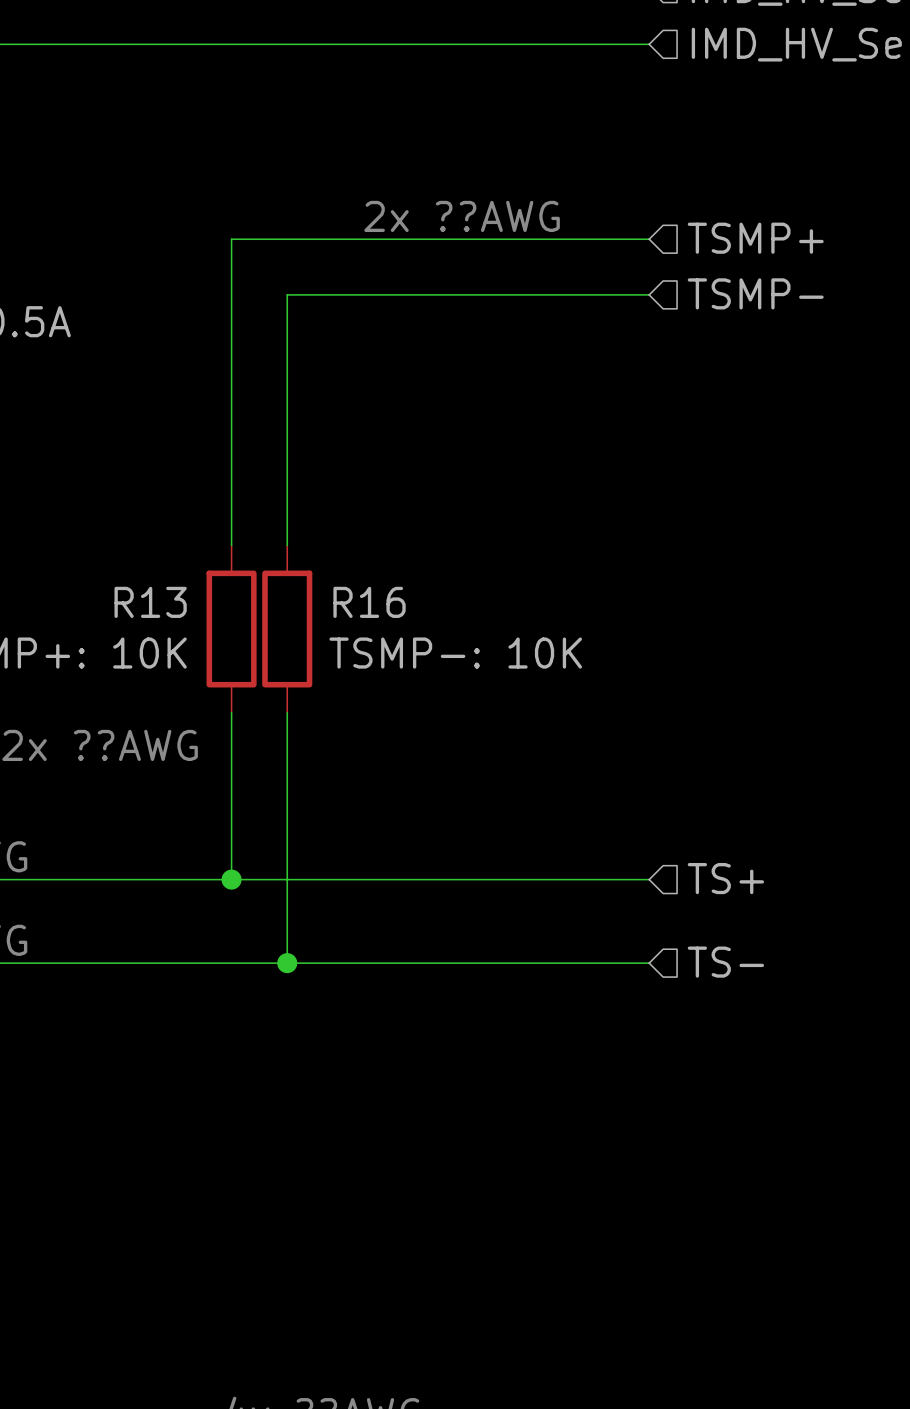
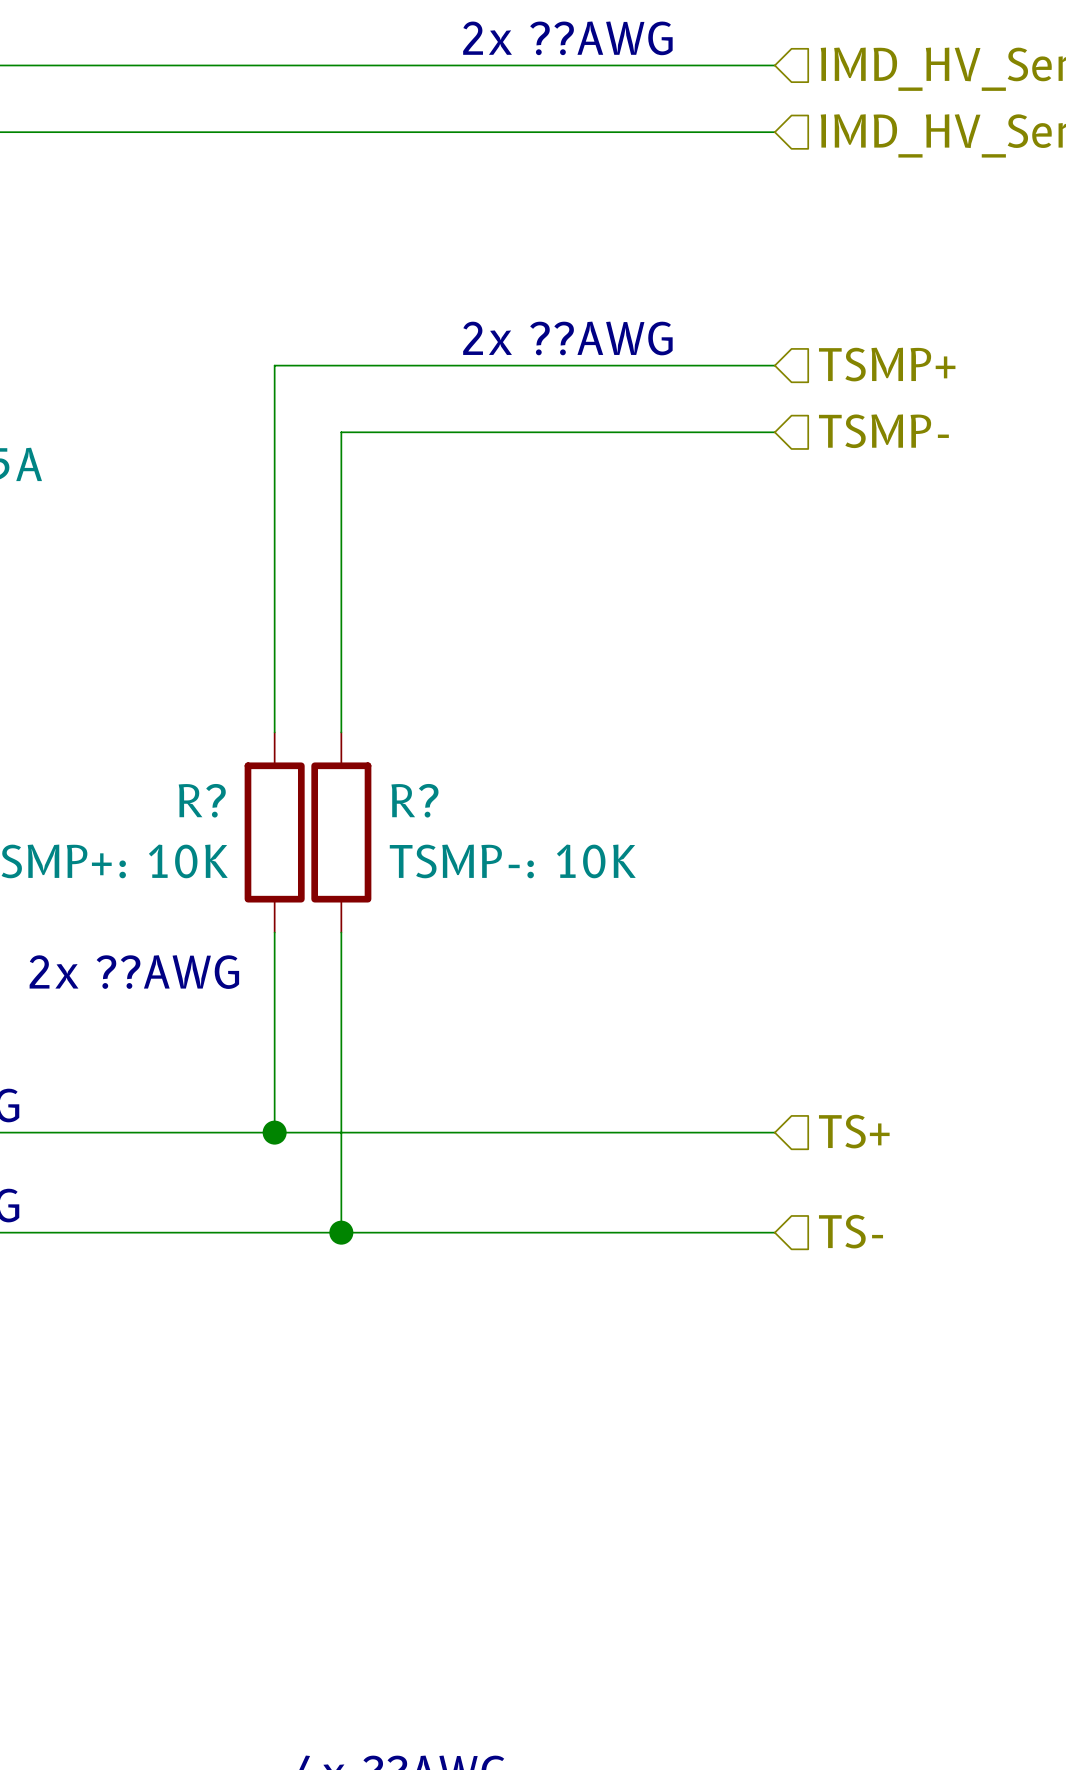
R13 name: R13 (150, 602) -> R? (202, 800)
R16 name: R16 (369, 602) -> R? (414, 800)

